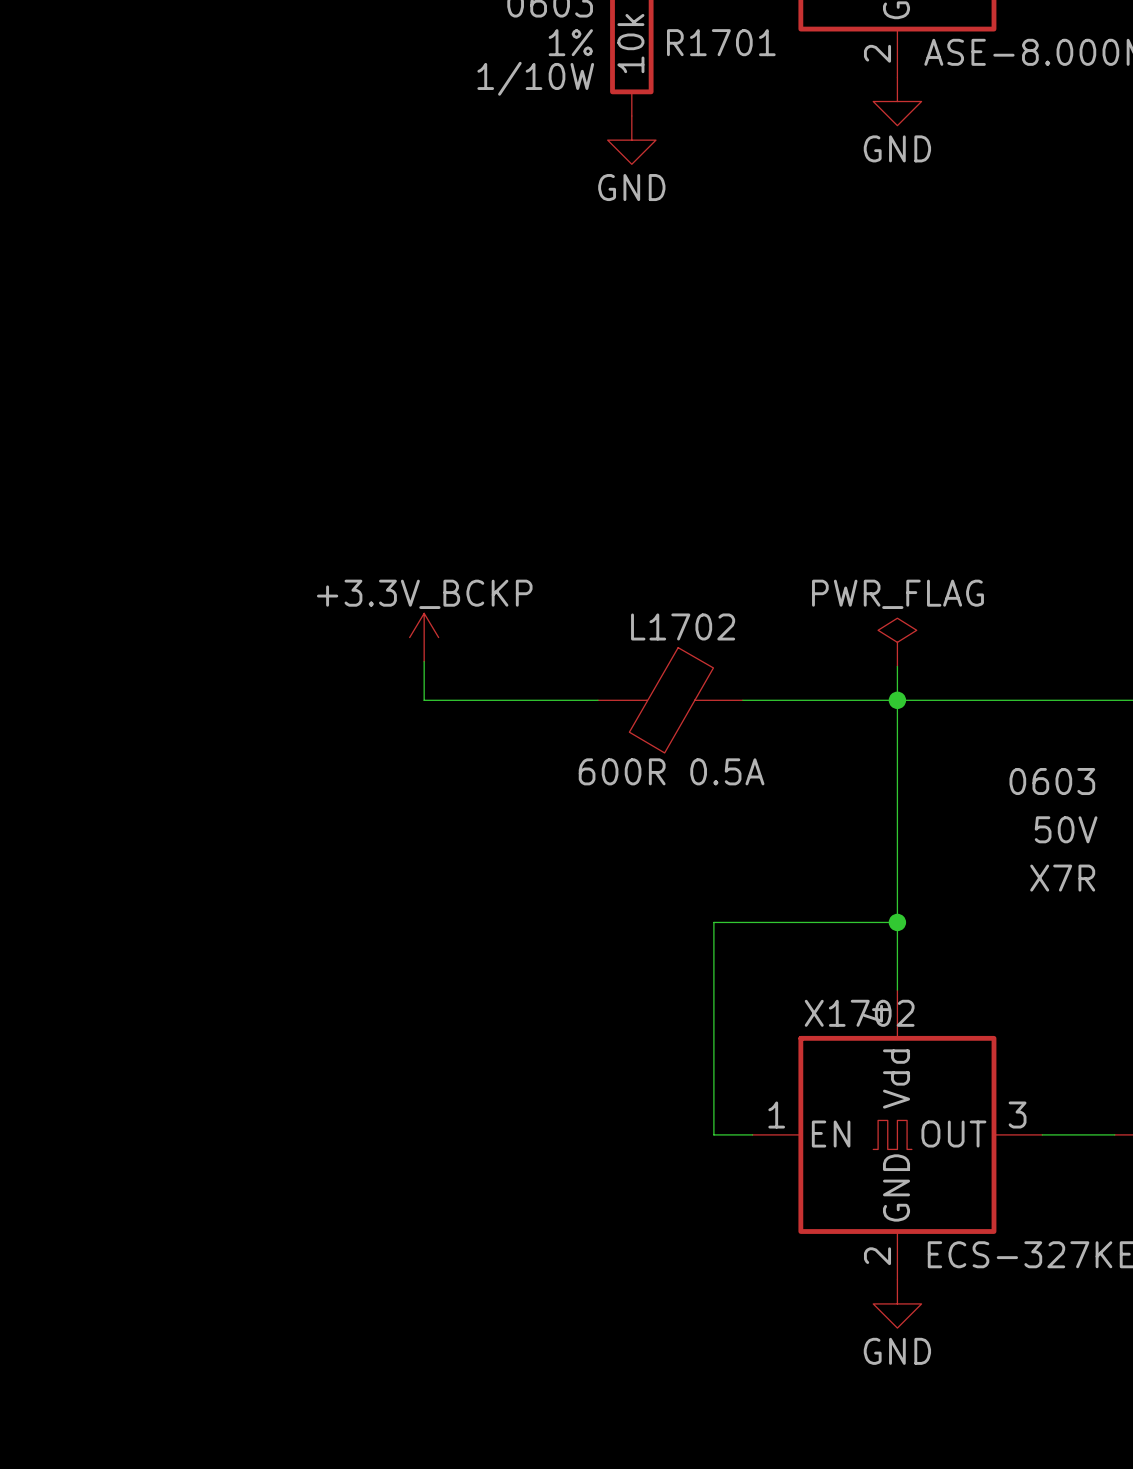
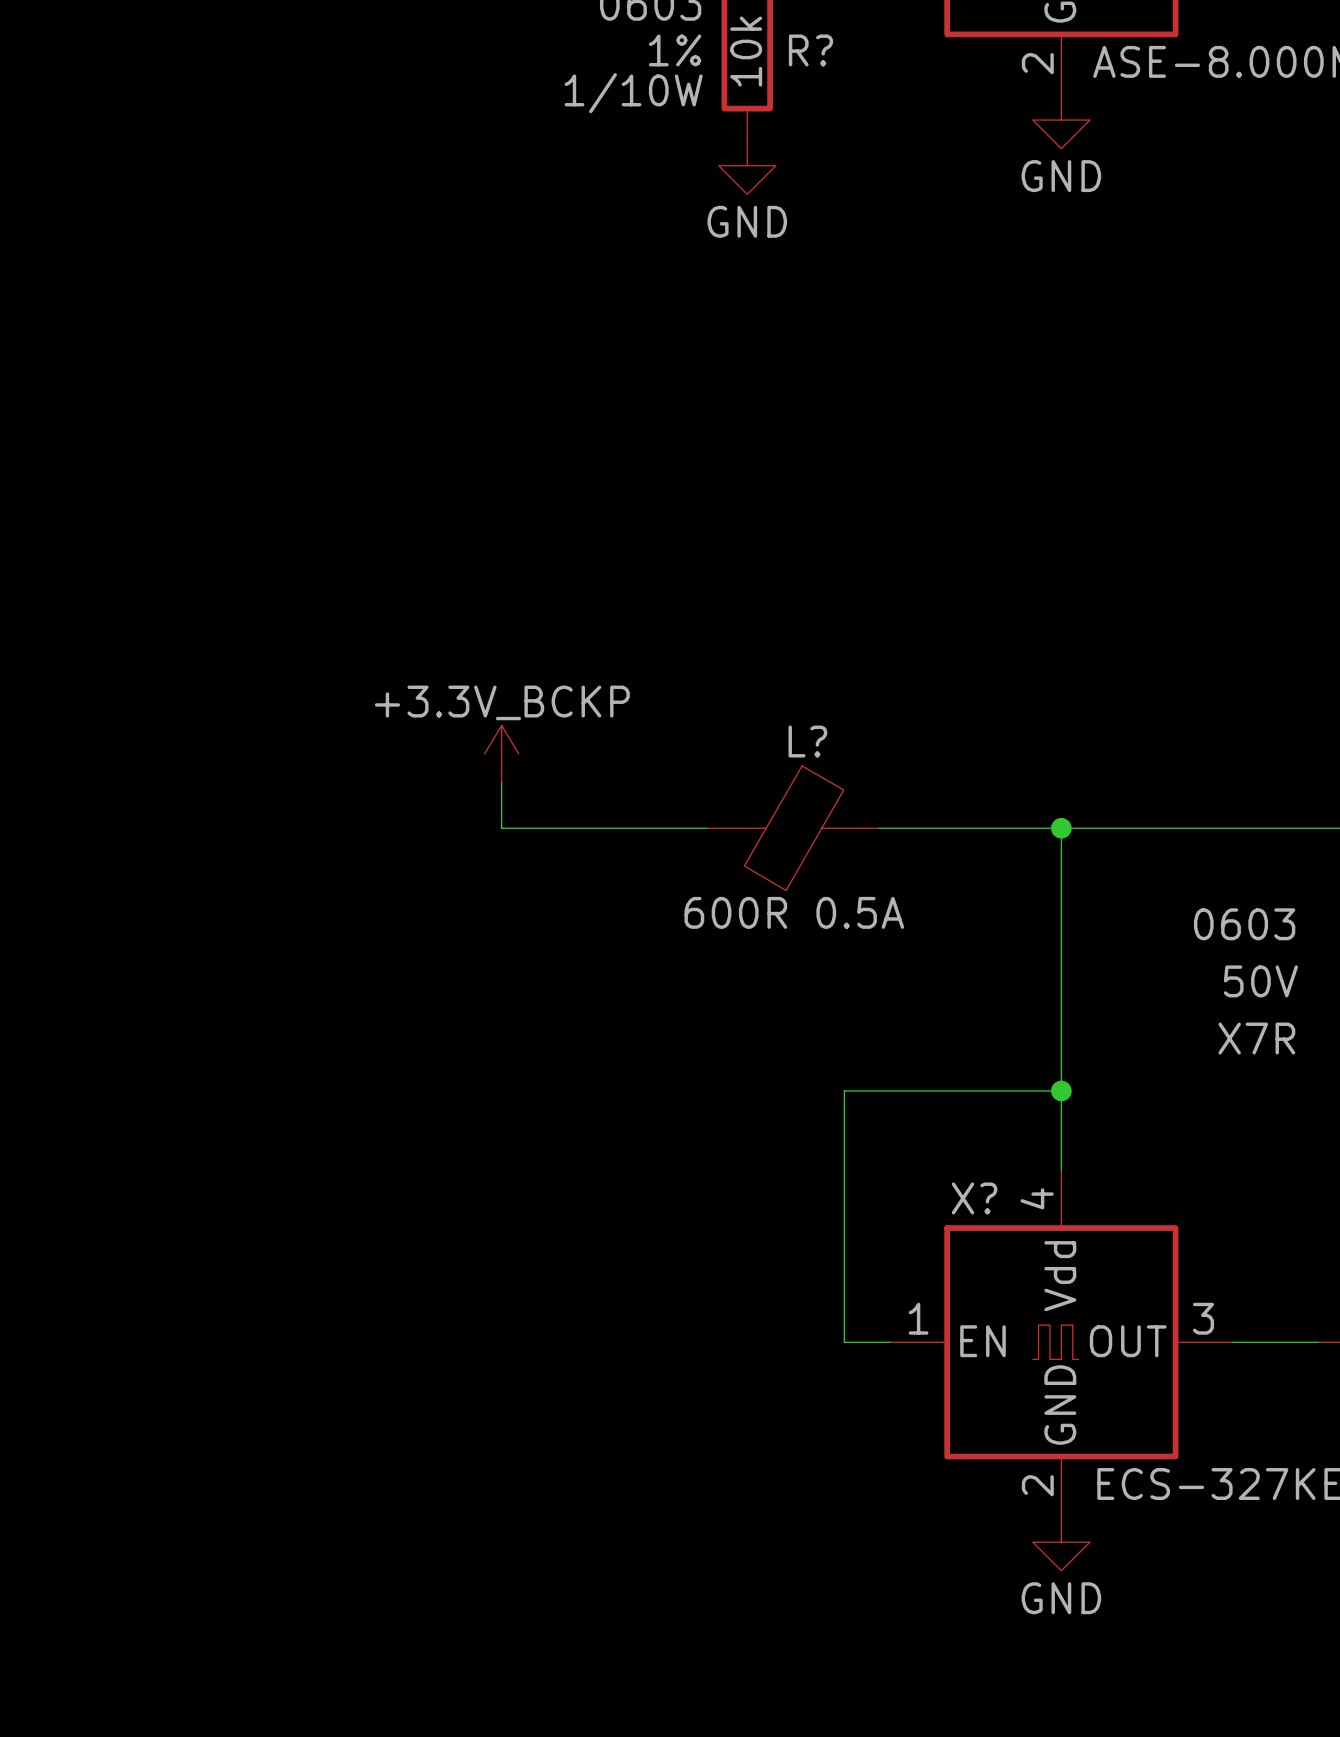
R1701 name: R1701 (721, 42) -> R? (810, 50)
L1702 name: L1702 (683, 626) -> L? (807, 741)
power symbol: PWR_FLAG (897, 642) -> none
wire: (897, 666) (897, 700) -> none
X1702 name: X1702 (859, 1013) -> X? (974, 1198)

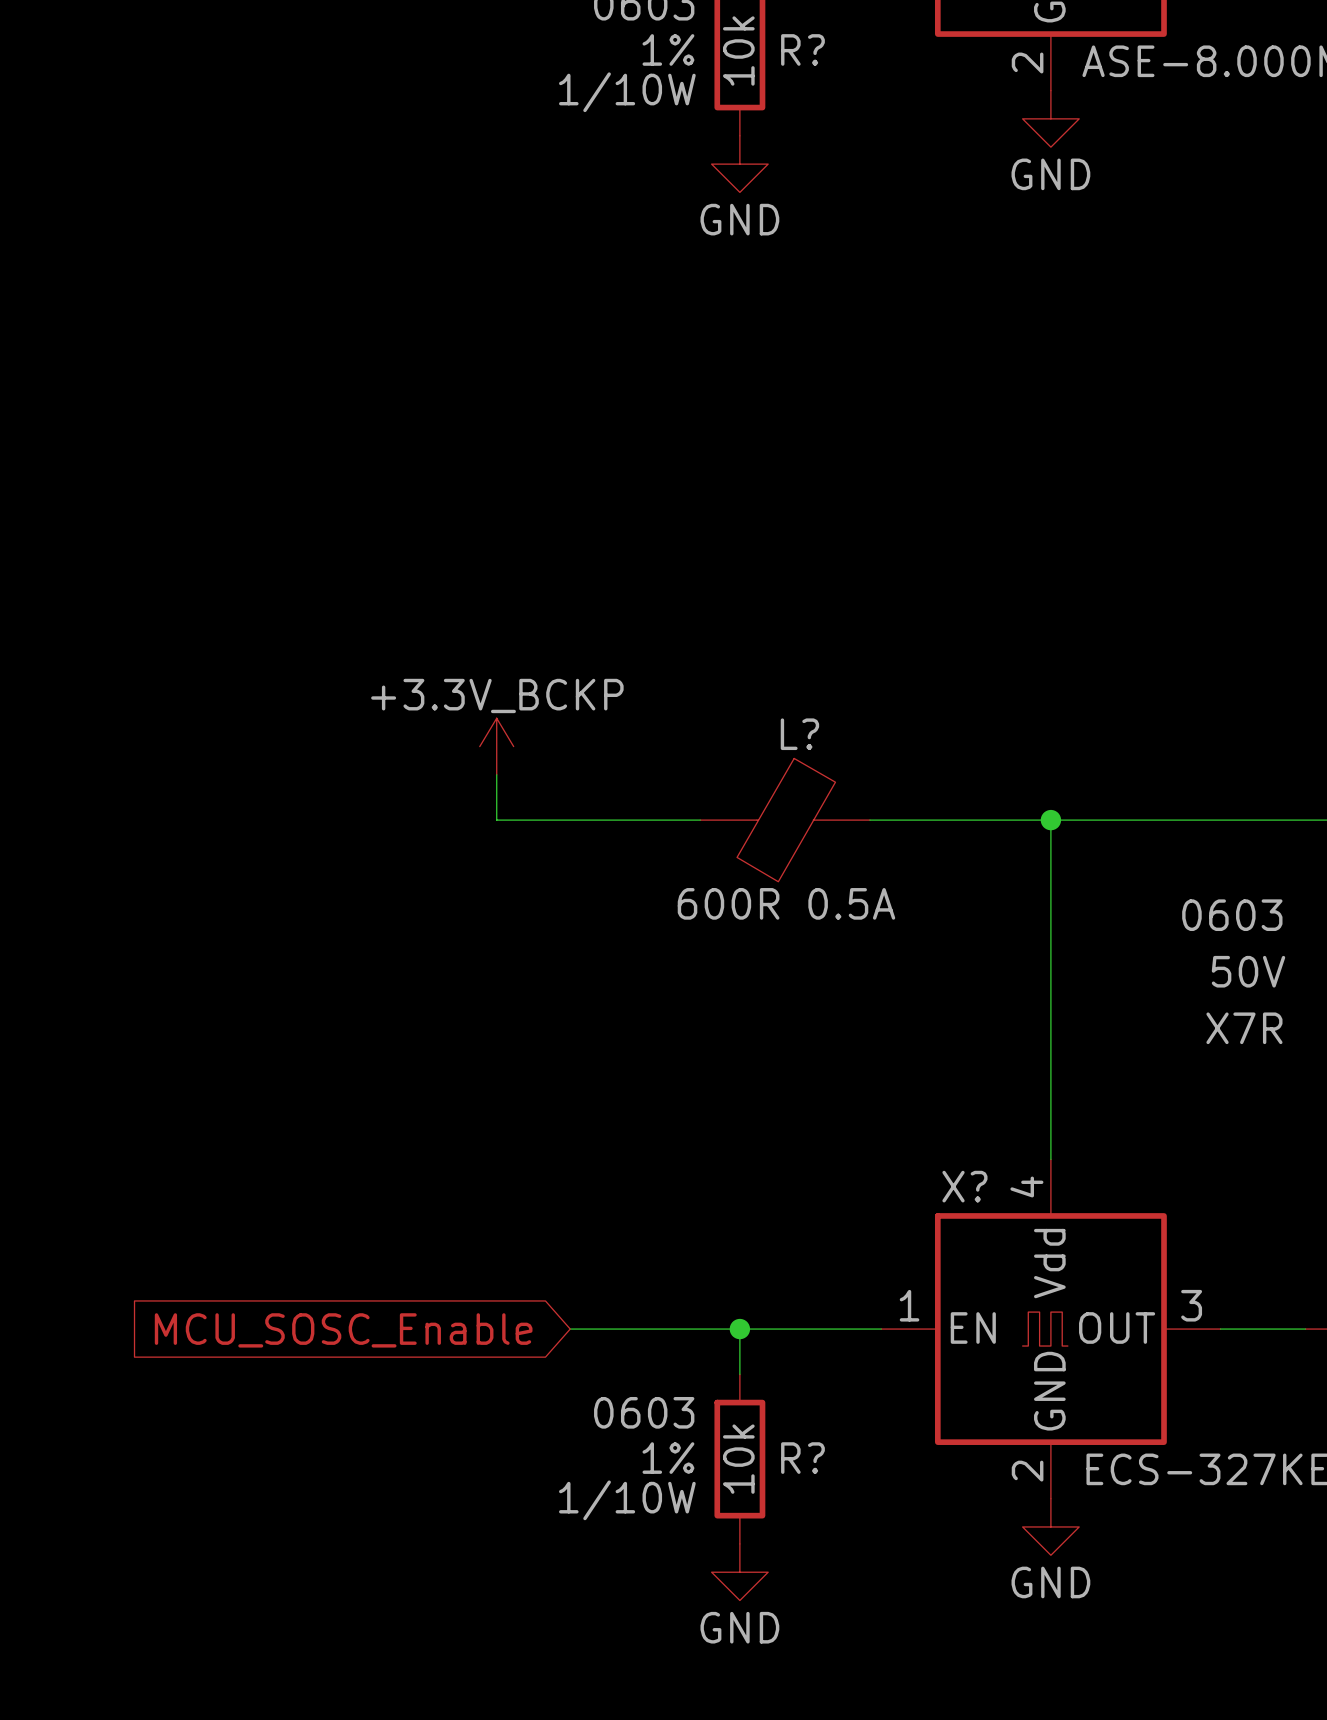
wire: (1061, 1090) (844, 1090) (844, 1342) -> (570, 1329) (836, 1329)
junction: (1061, 1090) -> none
wire: none -> (739, 1329) (739, 1374)
junction: none -> (739, 1329)
global label: none -> MCU_SOSC_Enable (343, 1330)
R?: none -> 10k (739, 1459)
power symbol: none -> GND (739, 1572)

